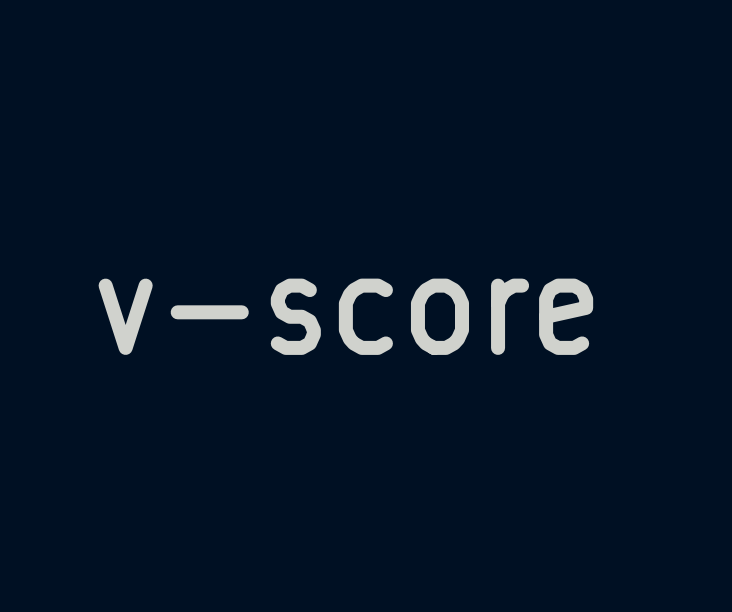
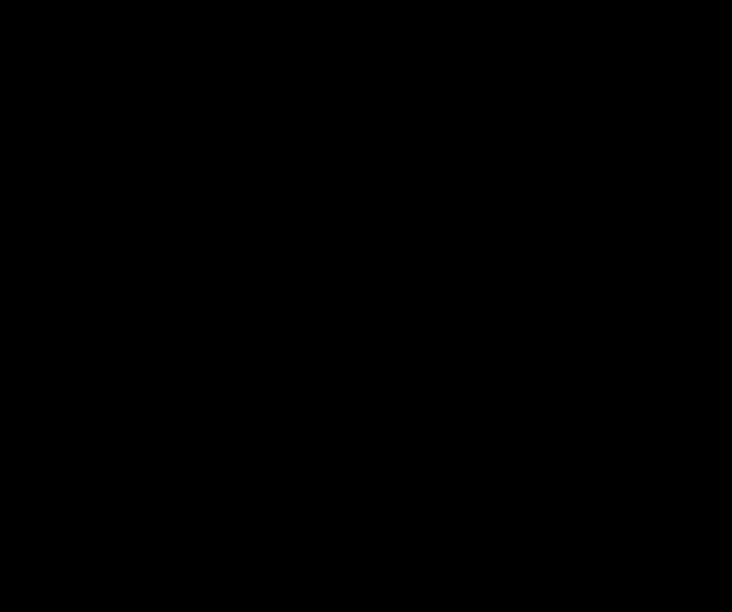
text: v-score (345, 316) -> none

